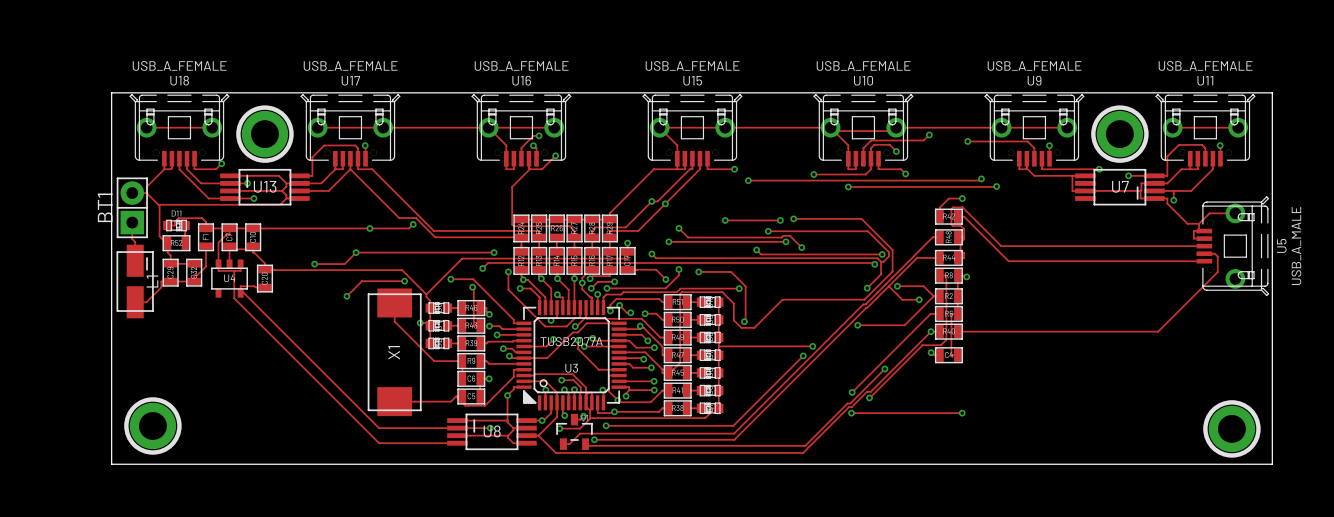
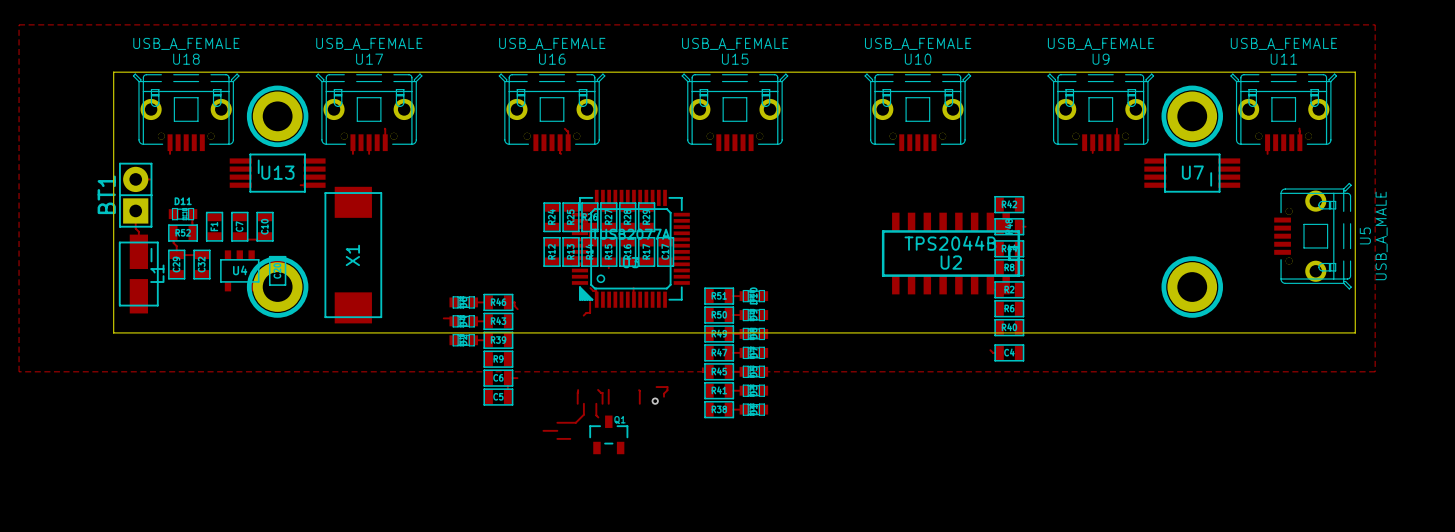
zone outline: none -> (19, 24) (19, 371) (1375, 371) (1375, 24) (19, 24)
track: (146, 127) (212, 127) -> none
track: (317, 127) (554, 127) -> none
track: (488, 127) (506, 145) (506, 169) (513, 169) (513, 158) -> none
track: (1067, 127) (896, 127) (892, 131) (833, 131) -> none
track: (1172, 127) (1238, 127) -> none
track: (929, 134) (923, 140) (871, 140) (863, 148) (863, 158) -> none
via: (929, 134) -> none
track: (539, 135) (533, 135) (521, 147) (521, 158) -> none
via: (539, 135) -> none
track: (967, 141) (1027, 141) (1034, 148) (1034, 158) -> none
via: (967, 141) -> none
via: (365, 145) -> none
via: (533, 145) -> none
via: (1049, 145) -> none
via: (1220, 145) -> none
track: (896, 151) (889, 144) (874, 144) (870, 148) (870, 169) (865, 174) (813, 174) -> none
via: (896, 151) -> none
track: (555, 155) (542, 169) (529, 169) (512, 186) (512, 224) (513, 226) (569, 226) (574, 230) (574, 252) -> none
via: (555, 155) -> none
track: (171, 158) (171, 168) (164, 169) (146, 186) (146, 193) (158, 204) (280, 204) (286, 198) (286, 195) (282, 190) -> none
track: (179, 158) (179, 169) (208, 198) (253, 198) -> none
track: (187, 158) (187, 169) (201, 183) (247, 183) -> none
track: (194, 158) (194, 169) (216, 169) (221, 163) -> none
track: (342, 158) (342, 169) (335, 169) (321, 183) (286, 183) -> none
track: (684, 158) (684, 169) (653, 169) (609, 213) (609, 219) (521, 219) -> none
track: (692, 158) (692, 169) (689, 169) (657, 201) (651, 201) (625, 227) (595, 227) (592, 230) (592, 252) -> none
track: (699, 158) (699, 169) (638, 230) (609, 230) (609, 252) -> none
track: (707, 158) (707, 169) (734, 169) -> none
track: (855, 158) (855, 169) (848, 169) (848, 145) (830, 127) (659, 127) (677, 145) (677, 169) -> none
track: (878, 158) (878, 169) (900, 169) (905, 173) -> none
track: (1019, 158) (1019, 169) (1026, 168) (1034, 175) (1085, 175) -> none
track: (1041, 158) (1041, 169) (1099, 169) -> none
track: (1197, 158) (1197, 169) (1181, 169) (1167, 183) (1141, 183) (1140, 190) -> none
track: (1205, 158) (1205, 148) (1202, 144) (1178, 144) (1167, 156) (1167, 175) (1128, 175) -> none
track: (1212, 158) (1212, 169) (1191, 190) (1154, 190) -> none
via: (221, 163) -> none
via: (734, 169) -> none
via: (1099, 169) -> none
via: (905, 173) -> none
via: (813, 174) -> none
track: (230, 175) (278, 175) (286, 183) -> none
track: (299, 175) (312, 175) (312, 157) (324, 145) (355, 145) (357, 148) (357, 169) (372, 169) (433, 230) (539, 230) (539, 252) -> none
track: (1072, 175) (1072, 190) (1140, 190) -> none
via: (1128, 175) -> none
track: (981, 178) (979, 180) (748, 180) -> none
via: (981, 178) -> none
via: (748, 180) -> none
via: (247, 183) -> none
track: (286, 183) (286, 186) (282, 190) -> none
via: (848, 186) -> none
track: (996, 186) (848, 186) -> none
via: (996, 186) -> none
track: (230, 190) (282, 190) -> none
track: (299, 190) (328, 190) (350, 169) (399, 218) (416, 218) (435, 237) (521, 237) (521, 252) -> none
track: (1140, 190) (1141, 198) (1167, 198) (1167, 203) (1187, 223) (1199, 223) -> none
track: (1173, 190) (1173, 200) -> none
via: (253, 198) -> none
track: (962, 198) (948, 198) (940, 207) (940, 216) -> none
via: (962, 198) -> none
via: (1173, 200) -> none
via: (651, 201) -> none
via: (665, 203) -> none
track: (159, 204) (159, 236) (167, 244) -> none
track: (1235, 213) (1209, 213) (1199, 223) -> none
track: (957, 216) (964, 216) (1008, 261) (1204, 261) -> none
track: (793, 218) (861, 218) (892, 249) (892, 271) (864, 299) (782, 299) (754, 327) (741, 327) (733, 320) (733, 303) (722, 292) (681, 292) (680, 293) (680, 362) (673, 369) (662, 369) (645, 352) (619, 352) -> none
via: (793, 218) -> none
track: (725, 220) (780, 220) -> none
via: (725, 220) -> none
via: (780, 220) -> none
track: (1199, 223) (1199, 231) -> none
track: (413, 224) (409, 228) (205, 228) (205, 222) (202, 218) (178, 218) (175, 221) (175, 225) (167, 225) -> none
via: (413, 224) -> none
track: (229, 228) (229, 234) (226, 234) (218, 242) (218, 270) (240, 270) (240, 263) -> none
via: (369, 228) -> none
track: (678, 228) (688, 237) (781, 237) (790, 235) (801, 247) -> none
via: (678, 228) -> none
track: (768, 231) (867, 231) (888, 252) (888, 256) (881, 261) -> none
via: (768, 231) -> none
track: (1204, 231) (1193, 231) (1193, 238) (1204, 238) -> none
track: (940, 237) (932, 237) (734, 433) (580, 433) (569, 444) (563, 444) -> none
track: (668, 241) (785, 241) -> none
via: (668, 241) -> none
via: (785, 241) -> none
track: (627, 243) (627, 258) (462, 258) (426, 294) -> none
via: (627, 243) -> none
track: (205, 246) (205, 266) (197, 275) (194, 275) (194, 281) (161, 281) (161, 287) (146, 302) (135, 302) -> none
track: (229, 246) (229, 263) -> none
track: (253, 246) (253, 252) (264, 263) (264, 269) (402, 270) (426, 294) -> none
track: (1204, 246) (1001, 246) (962, 207) (952, 207) (951, 224) (960, 225) (964, 229) (964, 239) (960, 242) (960, 250) (964, 253) (964, 257) (957, 257) -> none
via: (801, 247) -> none
track: (756, 249) (761, 254) (882, 254) -> none
via: (756, 249) -> none
via: (356, 252) -> none
track: (494, 252) (356, 252) (344, 264) (314, 264) -> none
via: (494, 252) -> none
track: (1204, 253) (1214, 253) (1217, 256) (1217, 272) (1158, 331) (957, 331) -> none
track: (651, 254) (656, 258) (877, 258) (881, 261) -> none
via: (651, 254) -> none
via: (882, 254) -> none
track: (940, 257) (917, 257) (734, 439) (594, 439) -> none
track: (881, 261) (881, 274) (867, 288) -> none
U2: none -> TPS2044B (950, 253)
via: (314, 264) -> none
track: (874, 264) (488, 262) (482, 268) -> none
via: (874, 264) -> none
via: (482, 268) -> none
track: (521, 269) (523, 279) (527, 279) (545, 297) (545, 307) -> none
track: (539, 269) (539, 276) (551, 288) (551, 307) -> none
track: (556, 269) (557, 278) (568, 289) (568, 307) -> none
track: (592, 269) (582, 277) (582, 289) (591, 297) (591, 307) -> none
track: (609, 269) (609, 276) (592, 276) (590, 278) -> none
track: (627, 269) (656, 269) (665, 279) -> none
track: (678, 269) (678, 275) (665, 288) (607, 288) -> none
via: (678, 269) -> none
track: (234, 270) (234, 298) (379, 443) (457, 443) -> none
track: (508, 271) (508, 289) (545, 326) (566, 326) (575, 317) (580, 317) (580, 307) -> none
via: (508, 271) -> none
track: (698, 271) (731, 271) (745, 286) (744, 321) -> none
via: (698, 271) -> none
track: (940, 275) (946, 275) (946, 339) (941, 345) (922, 345) (869, 397) -> none
track: (574, 276) (574, 307) -> none
track: (966, 276) (957, 275) (957, 313) (951, 313) (951, 355) (957, 355) -> none
via: (966, 276) -> none
via: (541, 278) -> none
via: (557, 278) -> none
via: (574, 278) -> none
via: (590, 278) -> none
track: (450, 279) (473, 279) (513, 319) (513, 323) (523, 323) -> none
via: (450, 279) -> none
via: (523, 279) -> none
via: (665, 279) -> none
track: (404, 281) (362, 281) (346, 296) -> none
via: (404, 281) -> none
track: (614, 281) (597, 281) (591, 288) -> none
via: (614, 281) -> none
via: (582, 282) -> none
track: (888, 286) (902, 299) (919, 299) -> none
track: (897, 286) (923, 286) (933, 296) (904, 325) (857, 325) -> none
via: (897, 286) -> none
track: (264, 287) (240, 286) (240, 293) -> none
track: (472, 287) (473, 325) (480, 325) -> none
via: (472, 287) -> none
track: (520, 288) (530, 288) (539, 297) (539, 307) -> none
via: (520, 288) -> none
via: (591, 288) -> none
via: (607, 288) -> none
track: (739, 288) (680, 288) (676, 292) (623, 292) (621, 294) (606, 294) (603, 297) (603, 307) -> none
via: (739, 288) -> none
via: (867, 288) -> none
track: (240, 289) (378, 428) (490, 428) -> none
track: (426, 294) (430, 300) (430, 343) -> none
via: (557, 294) -> none
via: (597, 294) -> none
via: (346, 296) -> none
via: (919, 299) -> none
track: (394, 302) (394, 321) (434, 361) (462, 361) (462, 378) -> none
track: (668, 302) (662, 302) (659, 299) (616, 299) (610, 305) (610, 310) -> none
track: (718, 302) (718, 408) (711, 408) (711, 411) (705, 418) (590, 418) -> none
track: (619, 305) (626, 312) (630, 312) -> none
via: (619, 305) -> none
track: (586, 307) (587, 318) (641, 318) (660, 337) (668, 337) -> none
via: (610, 310) -> none
via: (630, 312) -> none
track: (645, 313) (656, 313) (662, 319) (668, 319) -> none
via: (645, 313) -> none
track: (940, 313) (930, 313) (852, 392) -> none
via: (489, 314) -> none
track: (586, 317) (575, 326) -> none
via: (551, 320) -> none
via: (744, 321) -> none
via: (420, 322) -> none
track: (619, 323) (586, 323) (577, 332) (572, 332) (547, 358) (511, 358) (509, 356) -> none
via: (857, 325) -> none
track: (489, 326) (499, 326) (502, 329) (523, 329) -> none
via: (489, 326) -> none
via: (575, 326) -> none
via: (640, 326) -> none
track: (640, 328) (643, 328) (662, 346) (662, 355) (668, 355) -> none
track: (640, 328) (619, 329) -> none
via: (931, 331) -> none
track: (940, 331) (931, 331) (870, 391) (867, 391) (851, 407) (849, 407) (803, 452) (555, 452) (538, 435) (557, 417) (557, 392) (545, 381) (523, 381) -> none
track: (497, 334) (523, 334) -> none
via: (497, 334) -> none
track: (619, 334) (641, 334) (647, 340) -> none
board edge: (111, 336) (111, 464) (1272, 464) (1272, 336) -> (113, 332) (1355, 332)
track: (592, 338) (595, 340) (629, 340) (636, 347) (654, 347) -> none
via: (592, 338) -> none
track: (553, 339) (546, 346) (523, 346) -> none
via: (553, 339) -> none
track: (523, 340) (480, 343) -> none
track: (578, 340) (578, 349) (598, 369) (619, 369) -> none
via: (578, 340) -> none
via: (647, 340) -> none
track: (584, 346) (619, 346) -> none
via: (584, 346) -> none
track: (718, 346) (812, 346) -> none
via: (812, 346) -> none
via: (654, 347) -> none
track: (503, 348) (512, 348) (515, 352) (523, 352) -> none
via: (503, 348) -> none
X1 position: (394, 352) -> (353, 255)
via: (931, 352) -> none
U3 position: (571, 355) -> (630, 248)
track: (803, 355) (733, 425) (606, 425) -> none
via: (803, 355) -> none
via: (509, 356) -> none
track: (619, 358) (643, 359) -> none
via: (643, 359) -> none
track: (480, 361) (486, 361) (489, 363) (523, 363) -> none
track: (619, 363) (629, 363) (633, 367) (651, 367) -> none
via: (651, 367) -> none
track: (884, 368) (805, 445) (587, 445) (585, 444) -> none
via: (884, 368) -> none
track: (523, 369) (513, 369) (513, 376) (484, 405) (465, 405) (456, 396) -> none
track: (523, 375) (572, 374) (586, 387) (586, 402) -> none
track: (619, 375) (608, 375) (608, 391) (619, 402) (650, 402) (662, 390) (668, 390) -> none
via: (489, 378) -> none
track: (561, 380) (573, 380) (580, 387) (580, 402) -> none
via: (561, 380) -> none
track: (619, 381) (654, 381) -> none
via: (654, 381) -> none
track: (523, 387) (513, 387) (507, 395) (507, 422) (513, 428) (508, 435) -> none
via: (564, 389) -> none
via: (574, 389) -> none
via: (545, 390) -> none
via: (602, 390) -> none
track: (629, 390) (654, 390) -> none
via: (654, 390) -> none
via: (852, 392) -> none
via: (507, 395) -> none
track: (456, 396) (451, 401) (394, 401) -> none
via: (626, 396) -> none
via: (869, 397) -> none
track: (591, 402) (591, 392) (588, 392) (586, 395) (586, 406) (590, 410) (590, 418) (580, 428) (559, 428) -> none
track: (597, 402) (597, 413) (658, 411) (662, 408) (668, 408) -> none
via: (614, 411) -> none
track: (851, 413) (962, 413) -> none
via: (851, 413) -> none
via: (962, 413) -> none
via: (564, 415) -> none
track: (583, 416) (580, 419) (574, 419) -> none
via: (583, 416) -> none
track: (457, 420) (507, 420) -> none
via: (542, 420) -> none
part position: (152, 425) -> (277, 287)
via: (606, 425) -> none
via: (490, 428) -> none
via: (559, 428) -> none
part position: (1231, 428) -> (1192, 287)
U8: (491, 431) -> none
track: (457, 435) (508, 435) -> none
track: (508, 435) (513, 443) (526, 443) -> none
via: (594, 439) -> none

